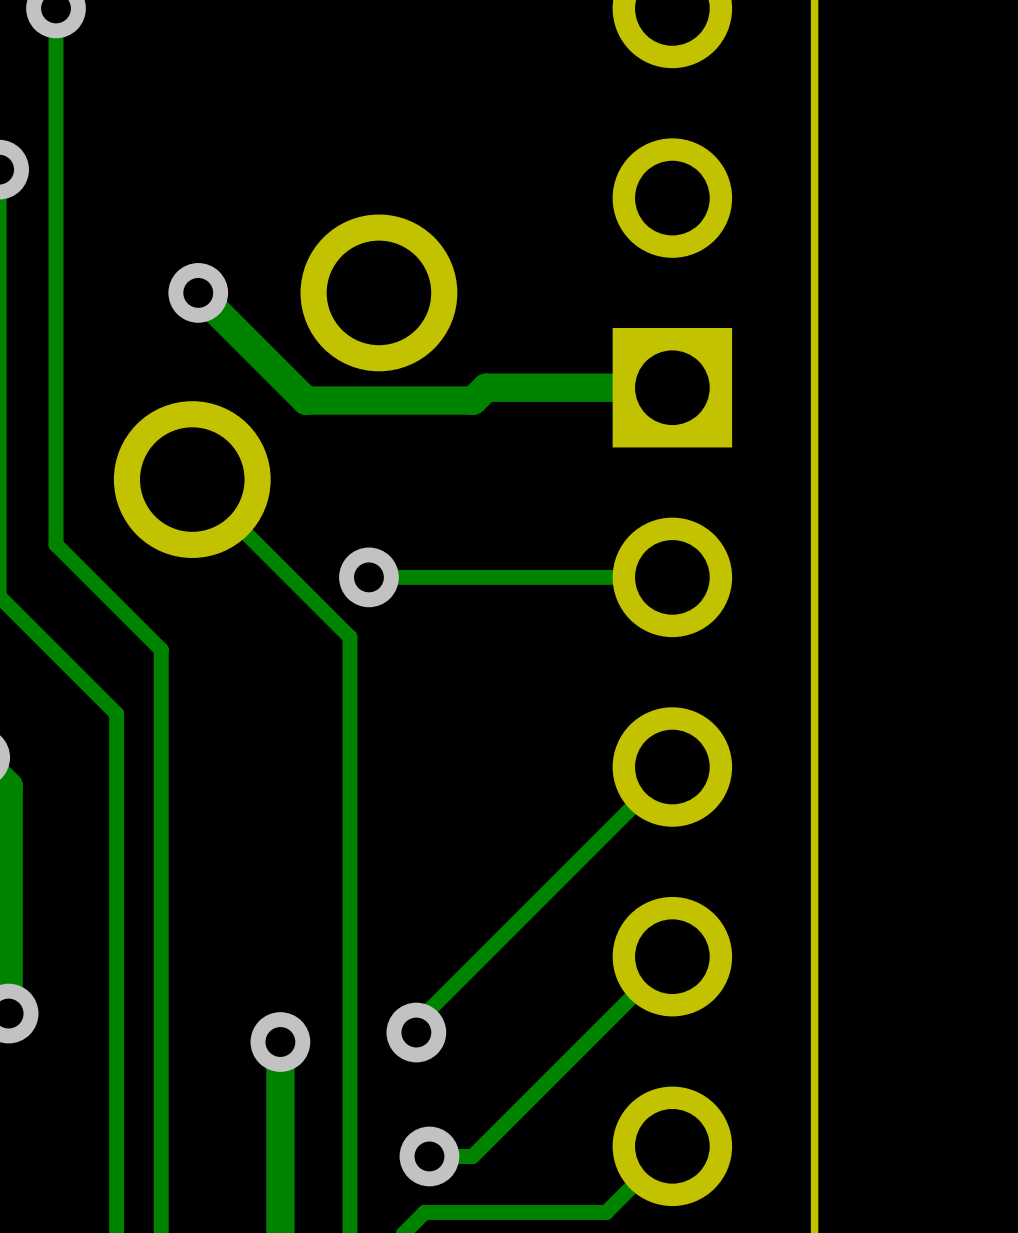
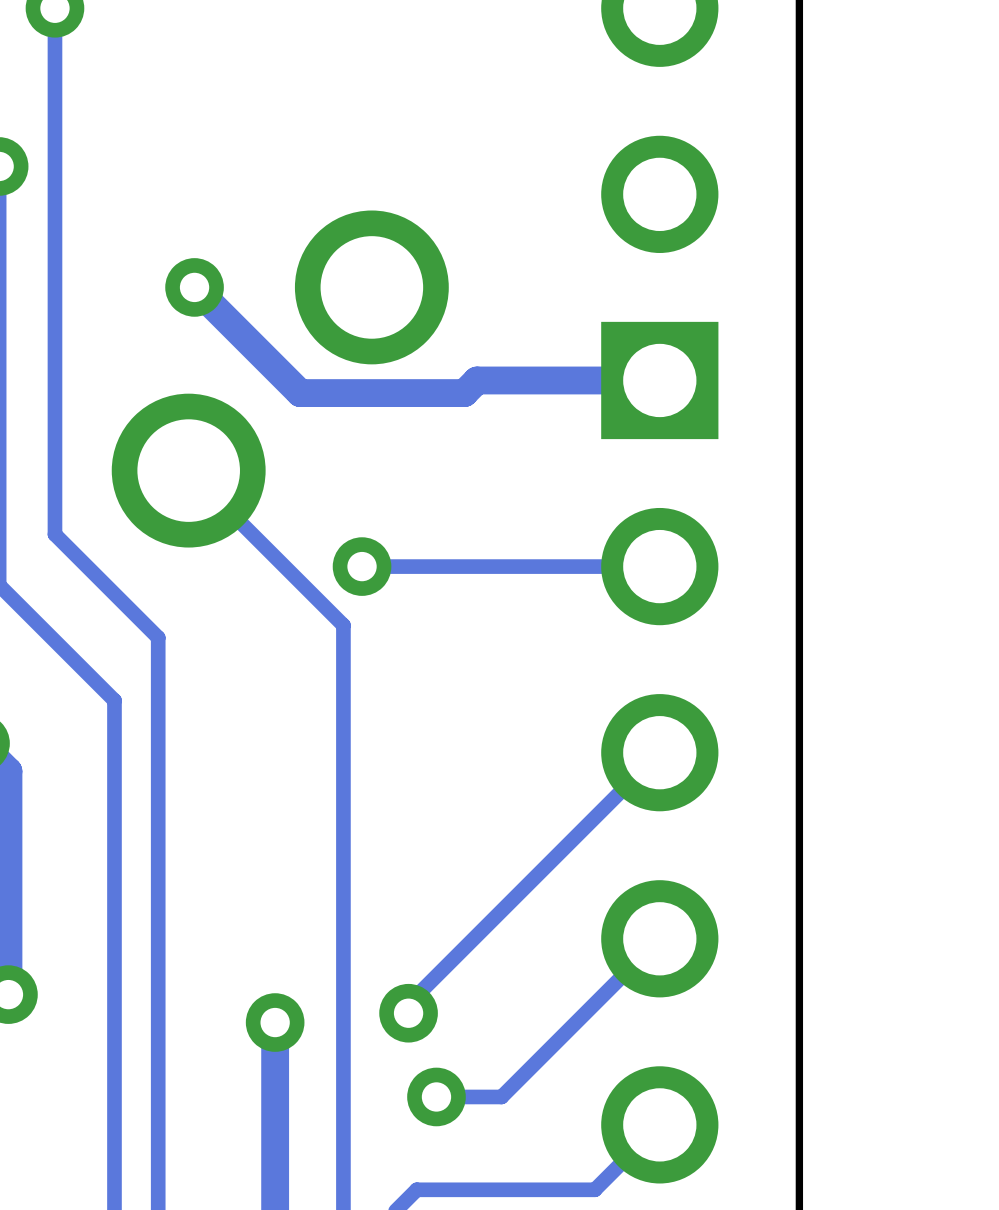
track: (511, 1117) (472, 1156) (429, 1156) -> (501, 1096) (436, 1096)
via position: (429, 1156) -> (436, 1096)

